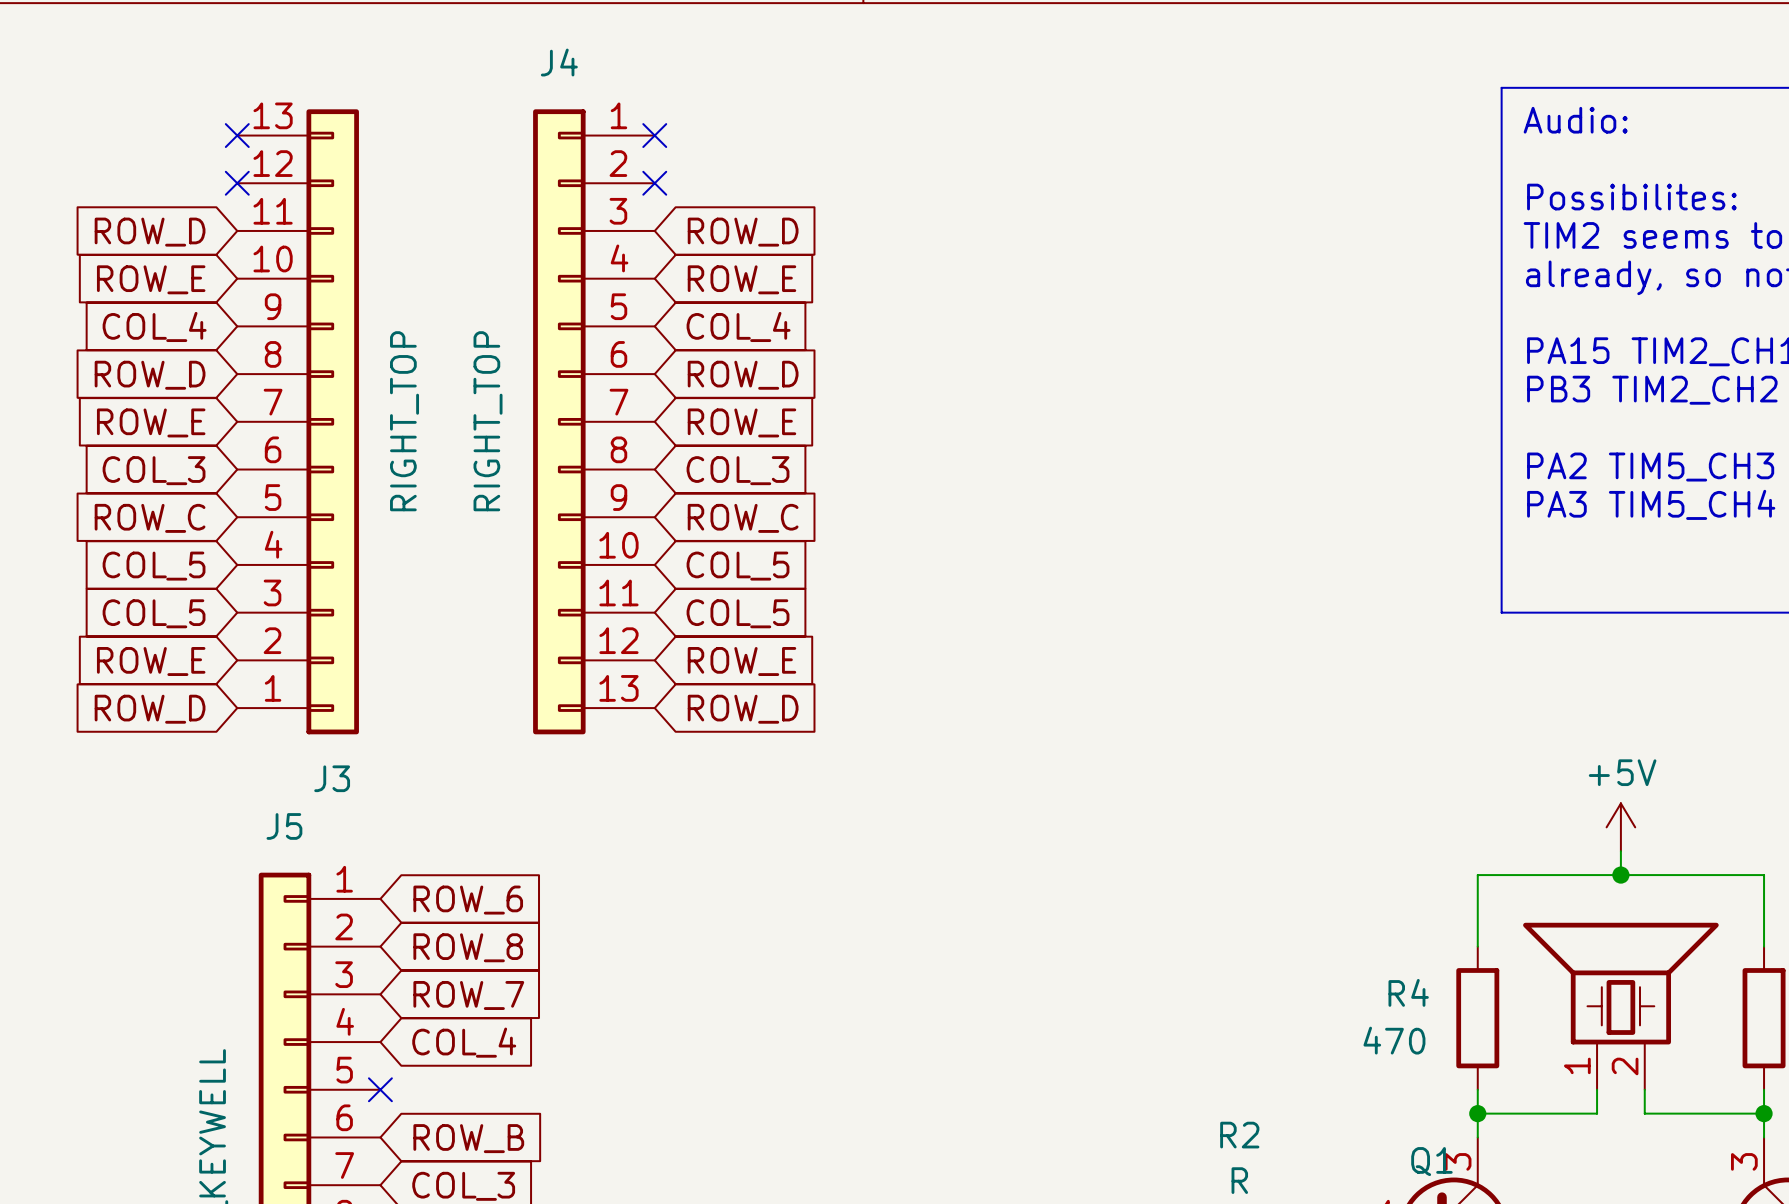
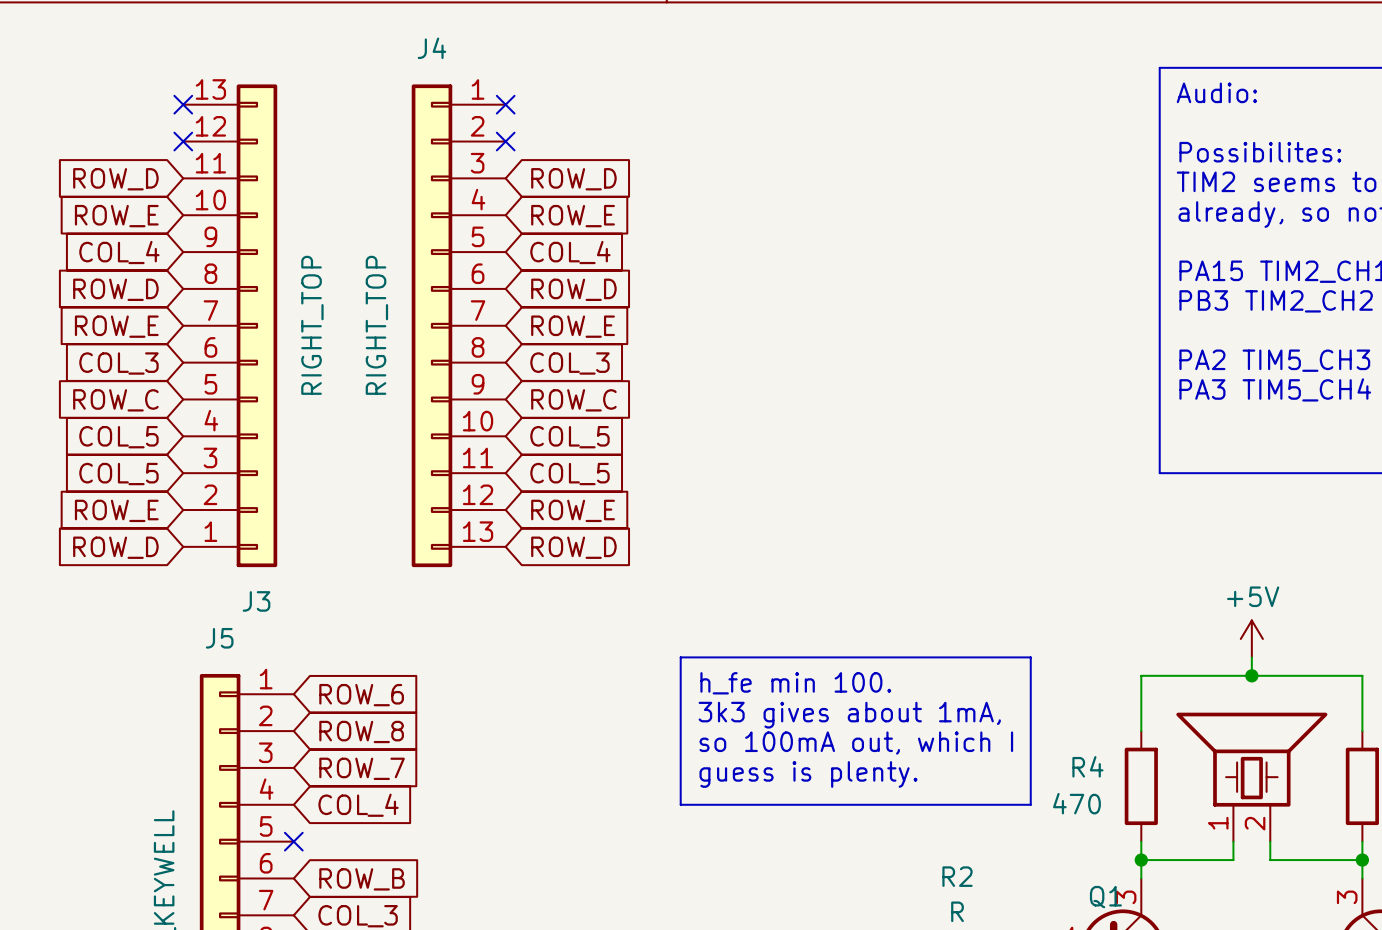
line: none -> (680, 657) (1030, 657) (1030, 804) (680, 804) (680, 657)
text: none -> h_fe min 100. (795, 683)
text: none -> 3k3 gives about 1mA, (849, 715)
text: none -> so 100mA out, which I (856, 743)
text: none -> guess is plenty. (808, 774)

